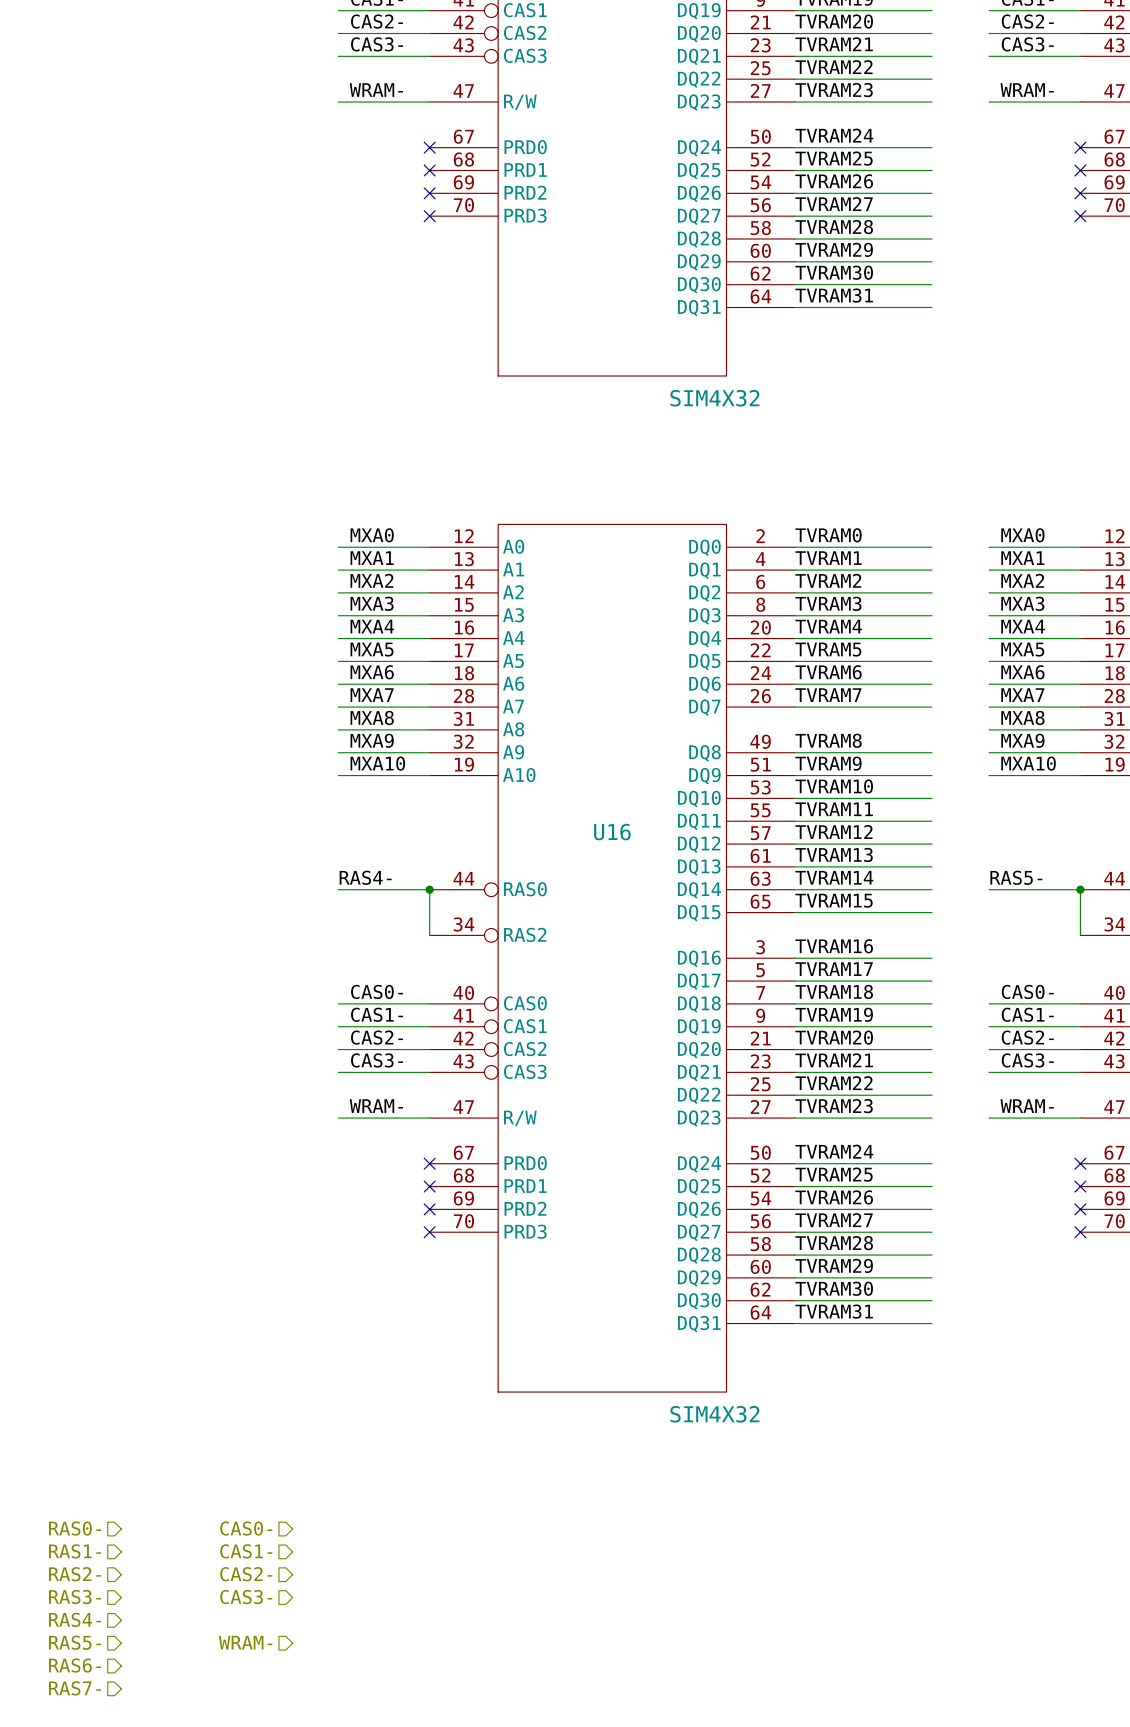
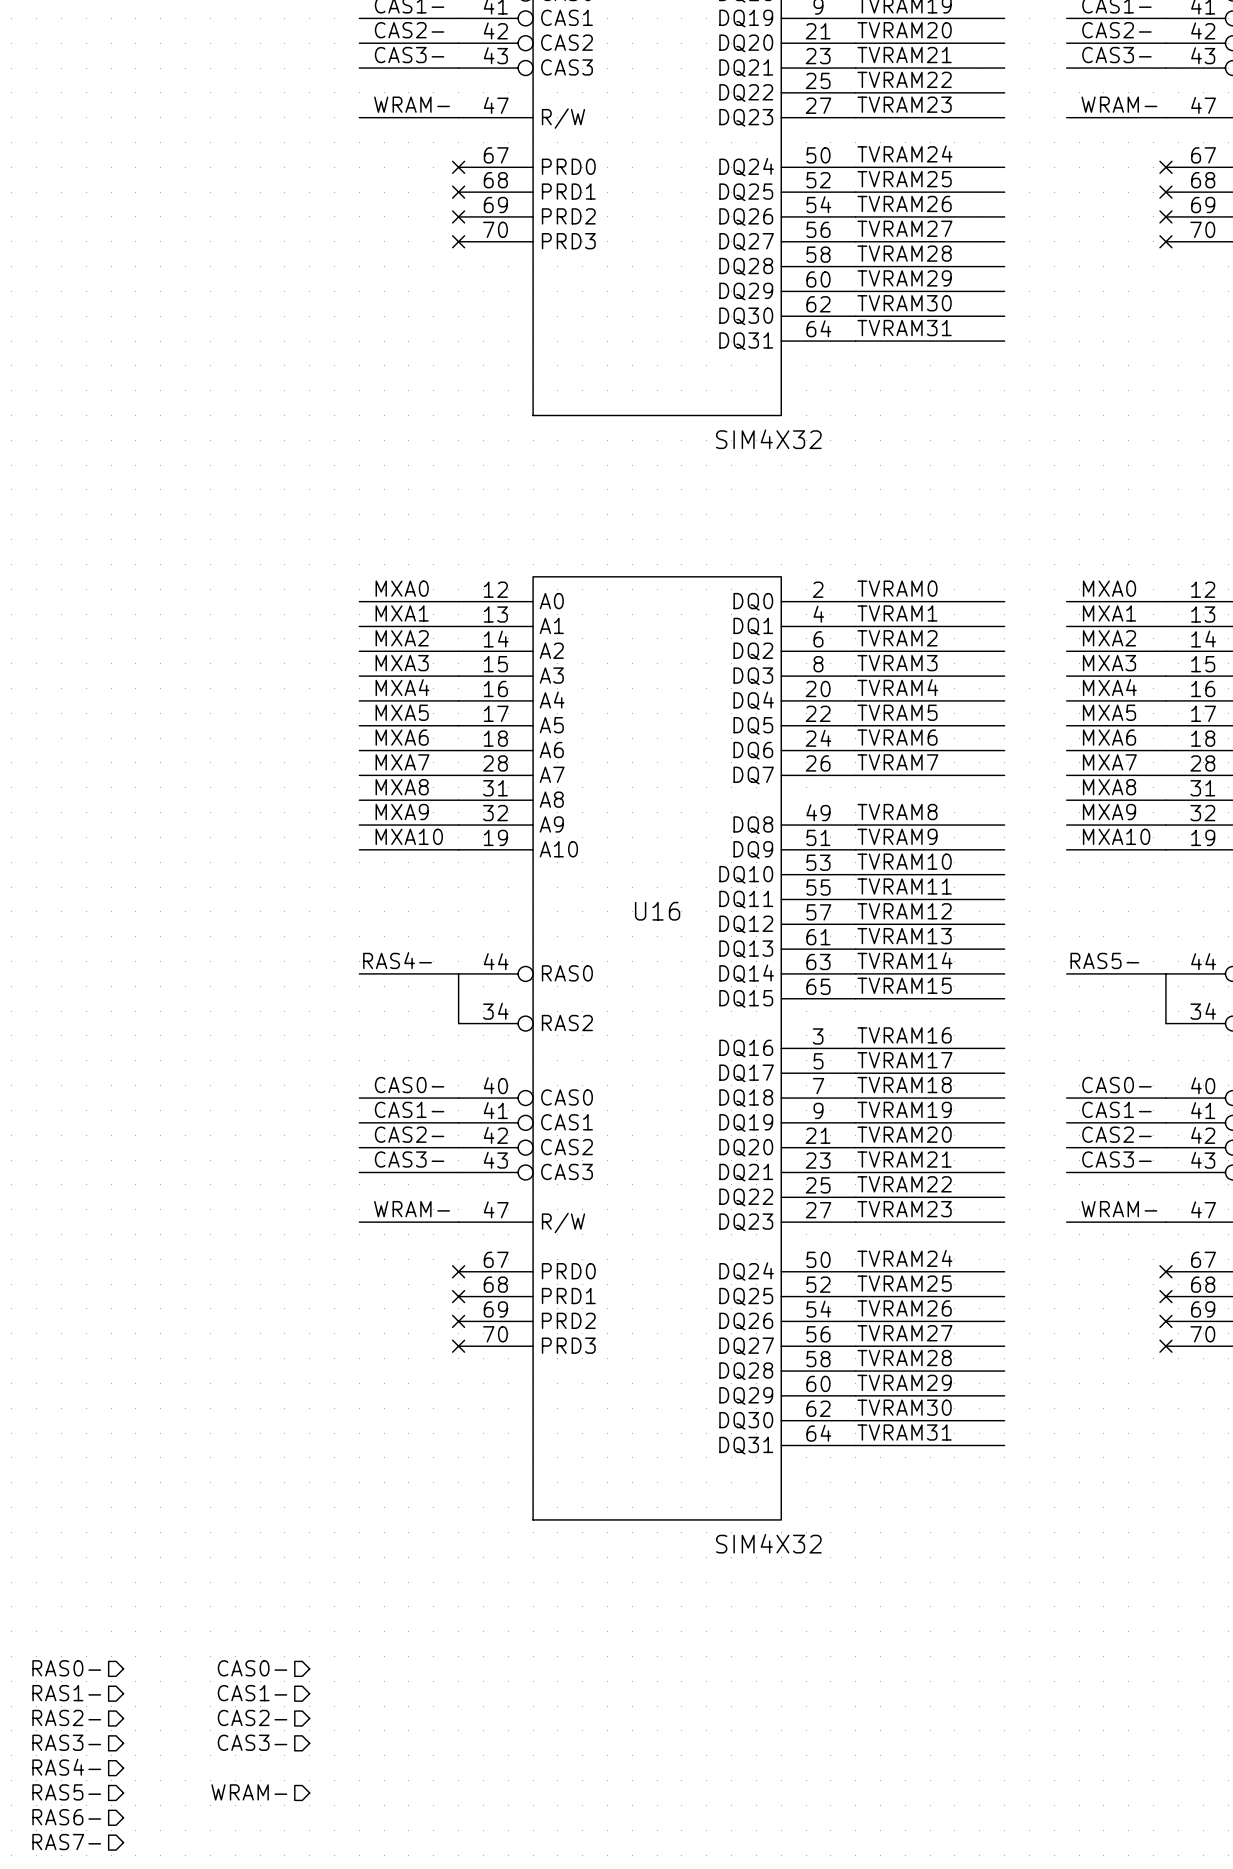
junction: (429, 889) -> none
junction: (1080, 889) -> none

